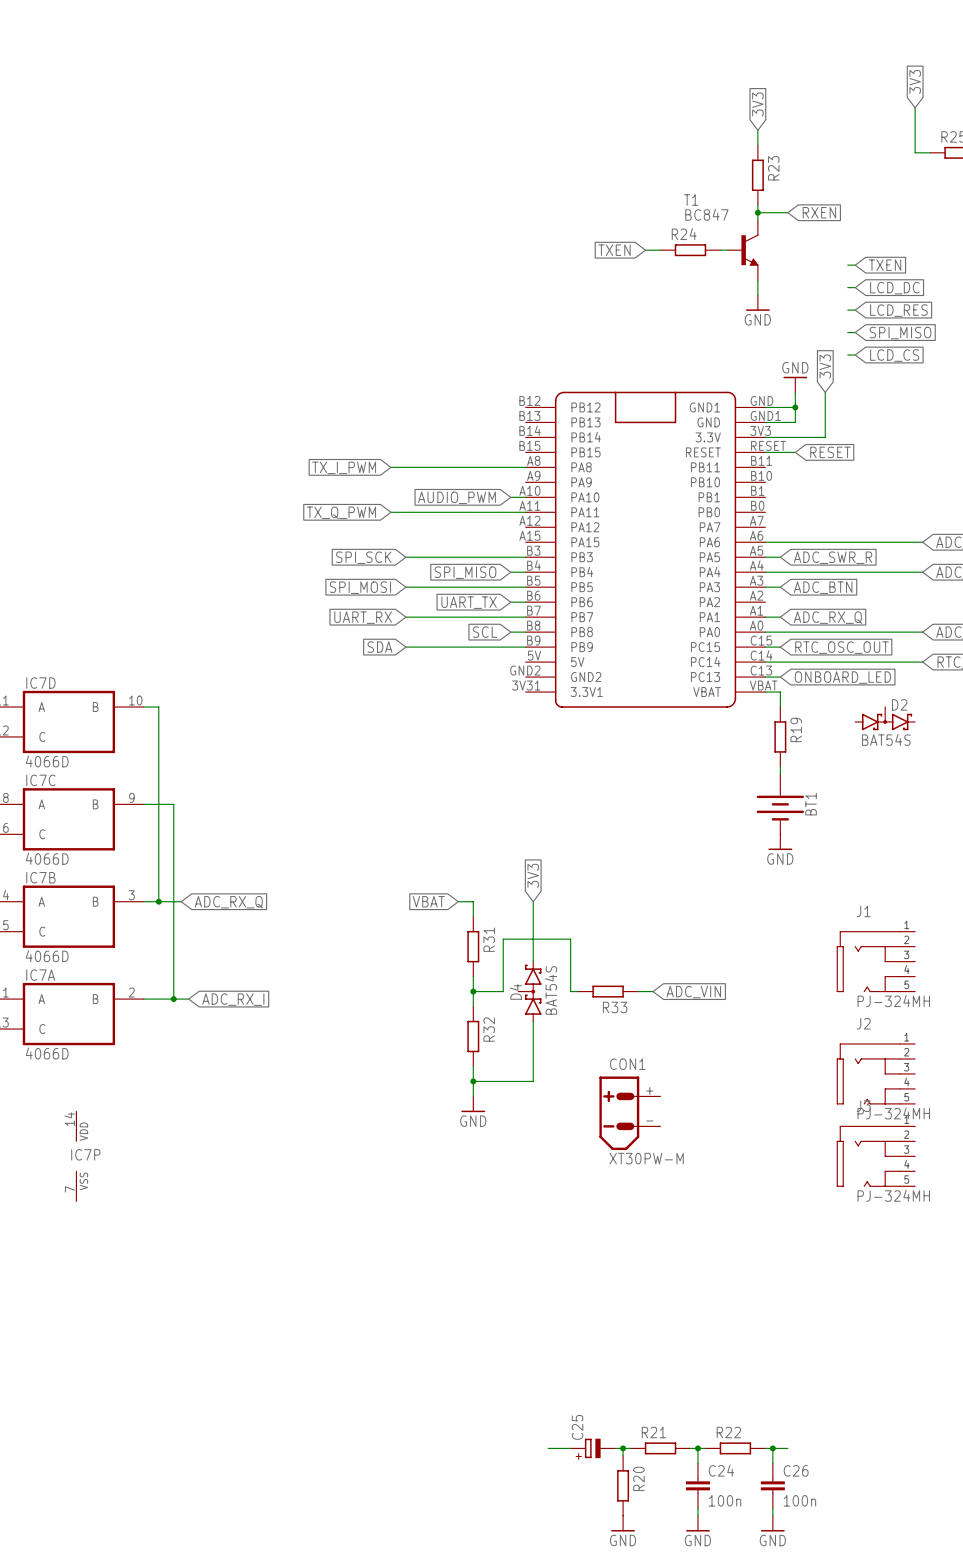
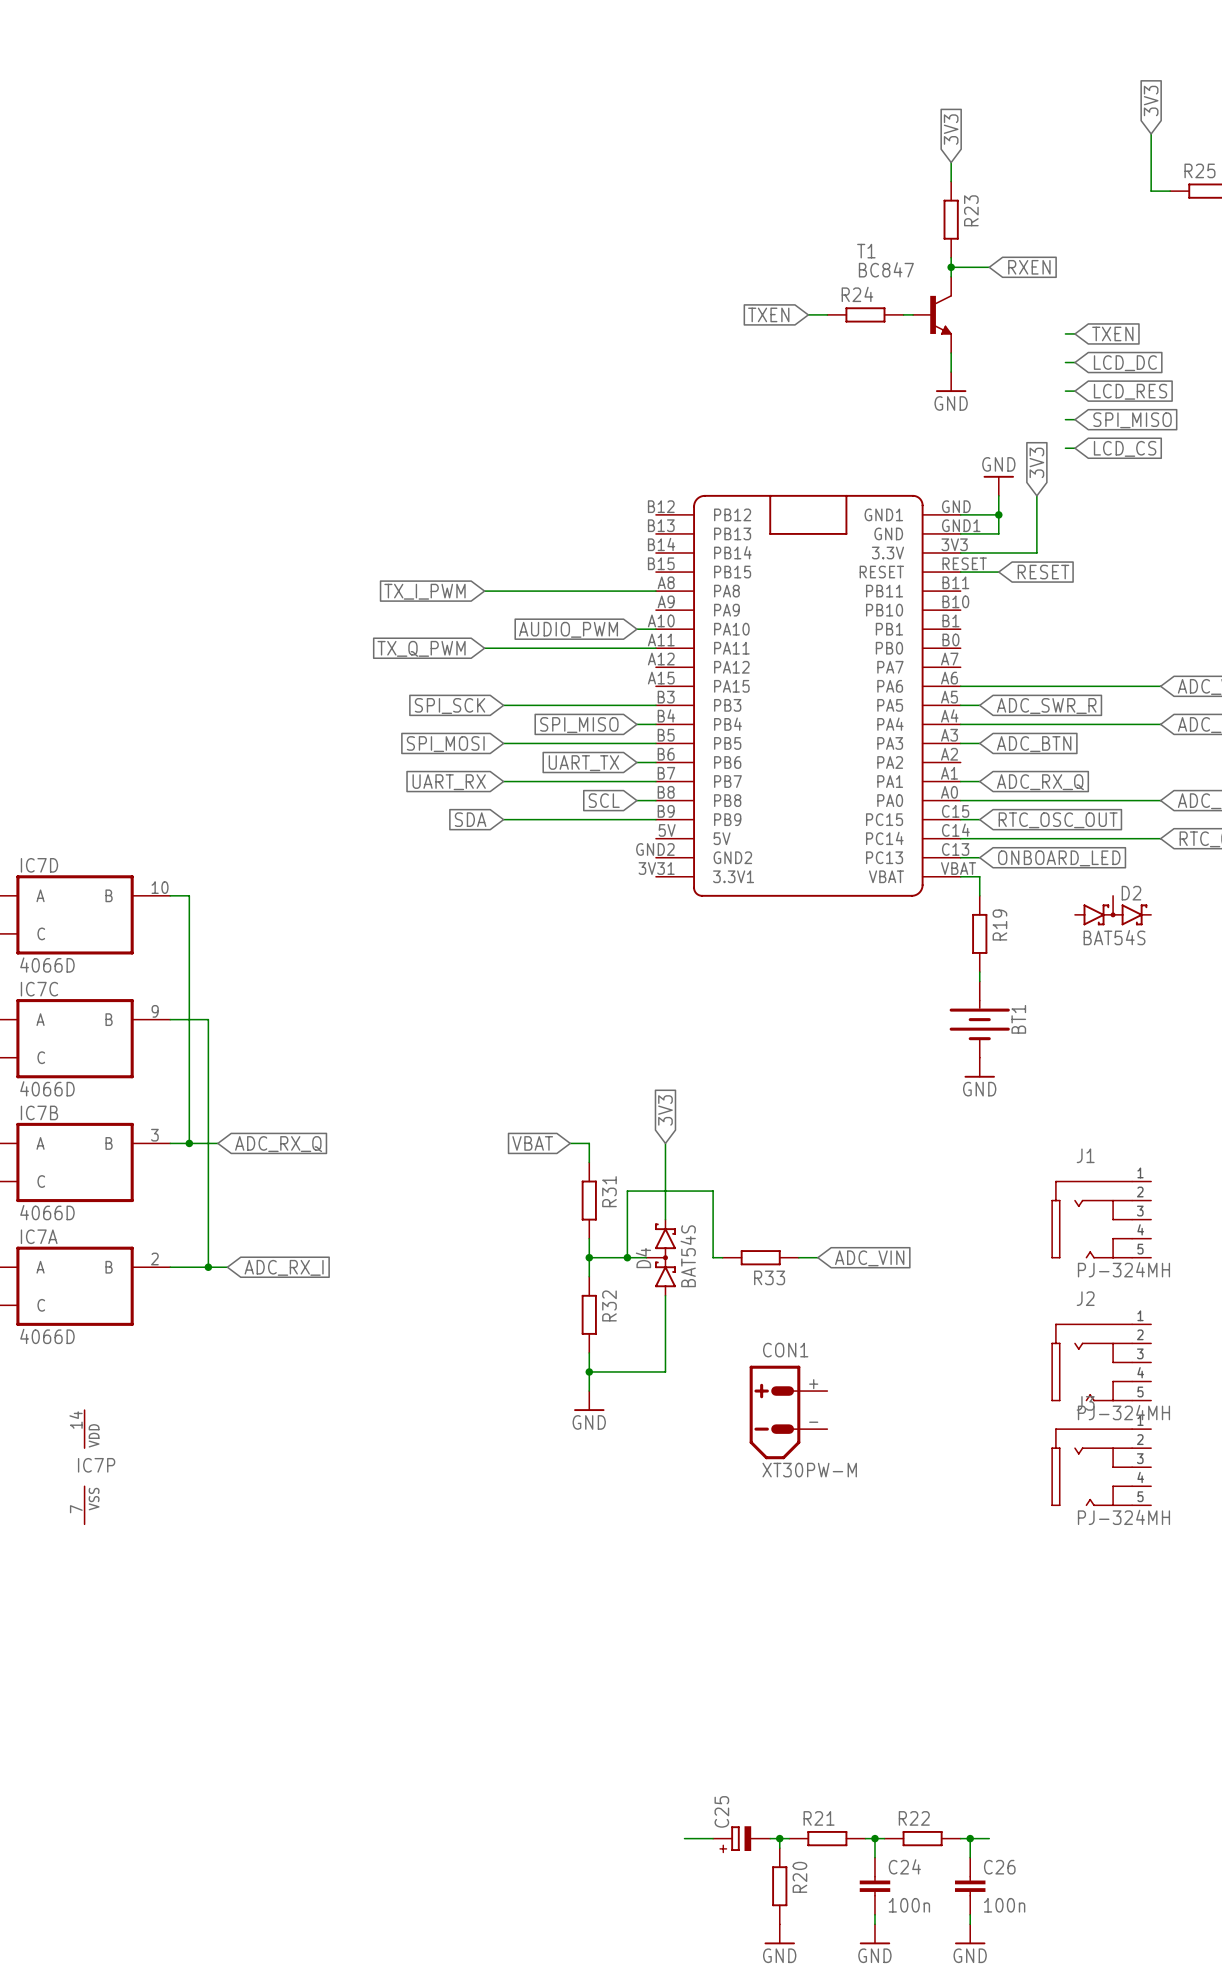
wire: none -> (627, 1257) (646, 1257)
junction: none -> (627, 1257)

